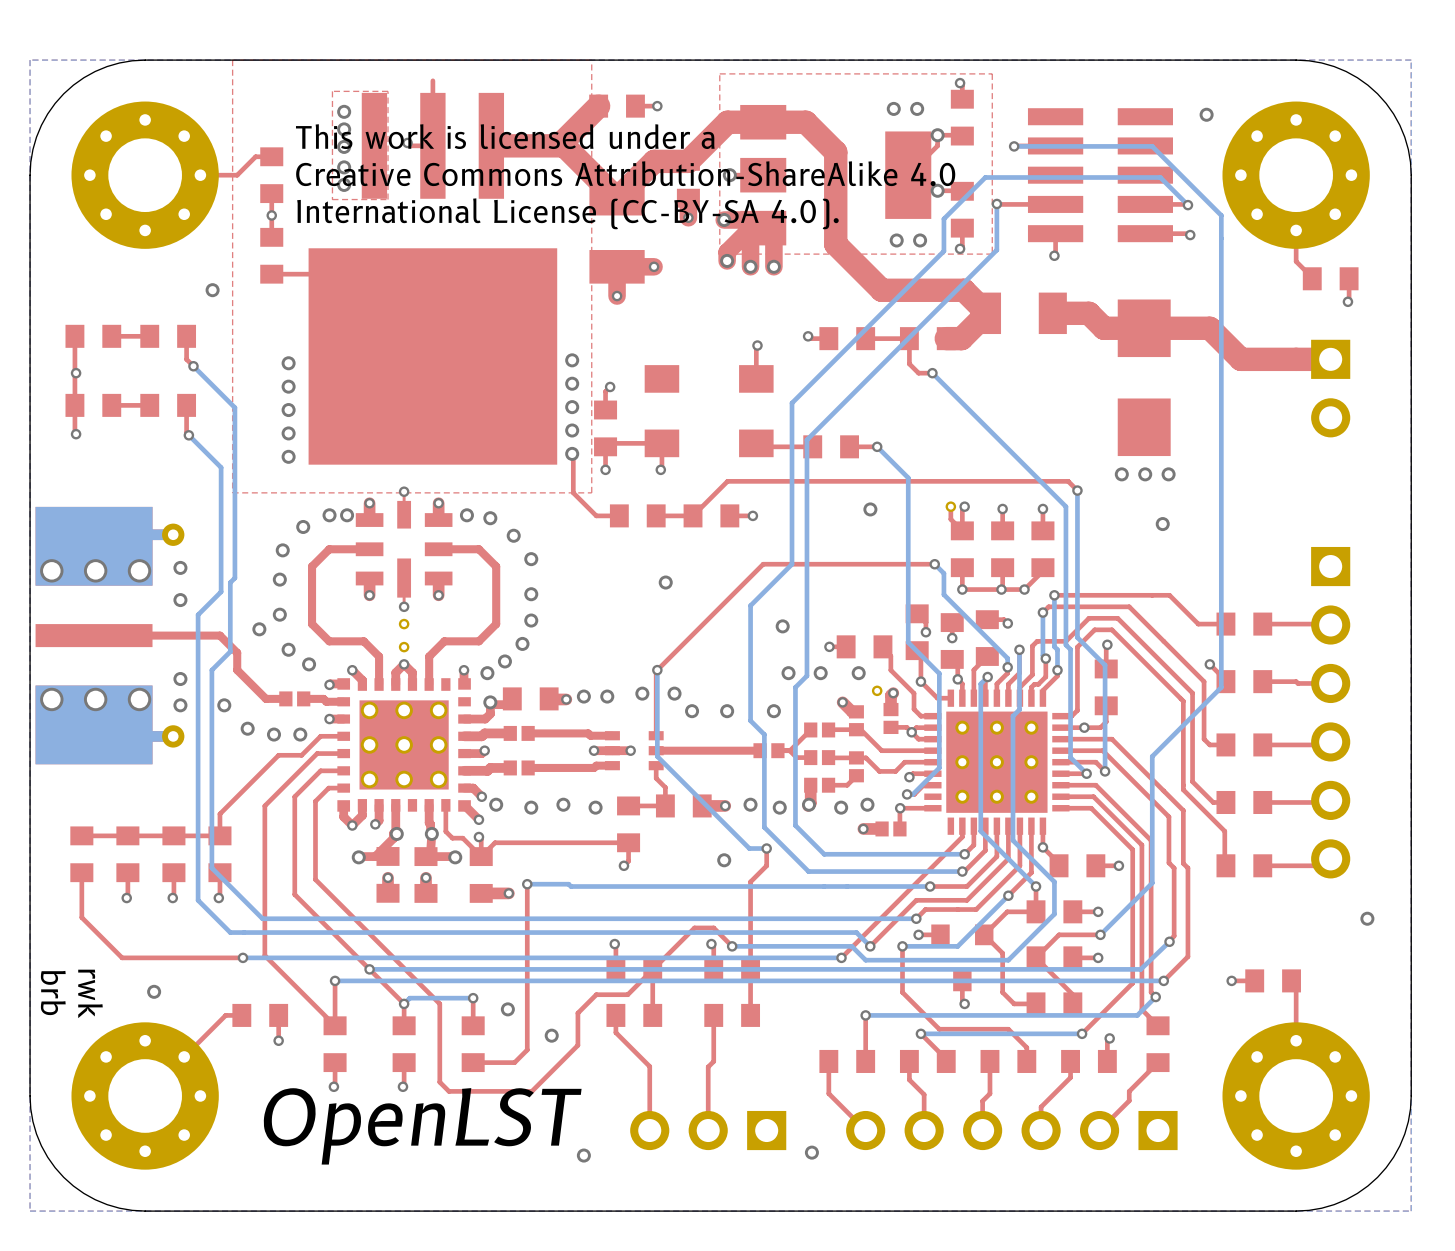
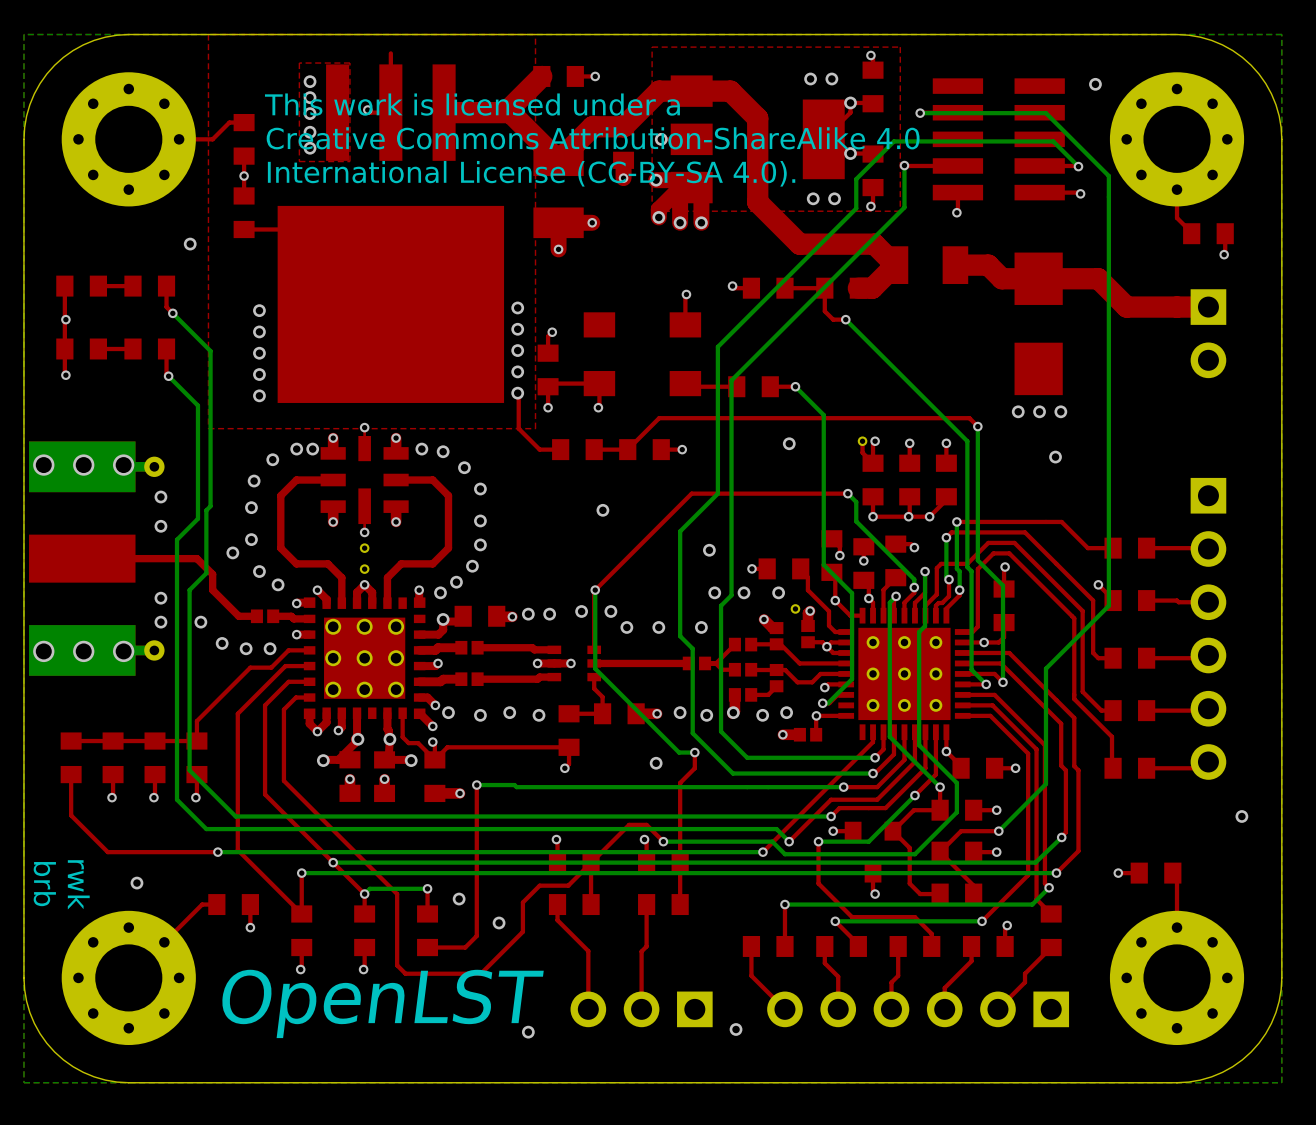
part footprint: [35, 506, 185, 765] -> [29, 441, 165, 676]
via: none -> (43, 465)
via: none -> (83, 465)
via: none -> (123, 465)
via: (51, 570) -> none
via: (95, 570) -> none
via: (139, 570) -> none
via: (51, 699) -> none
via: (95, 699) -> none
via: (139, 699) -> none
via: none -> (43, 651)
via: none -> (83, 651)
via: none -> (123, 651)

